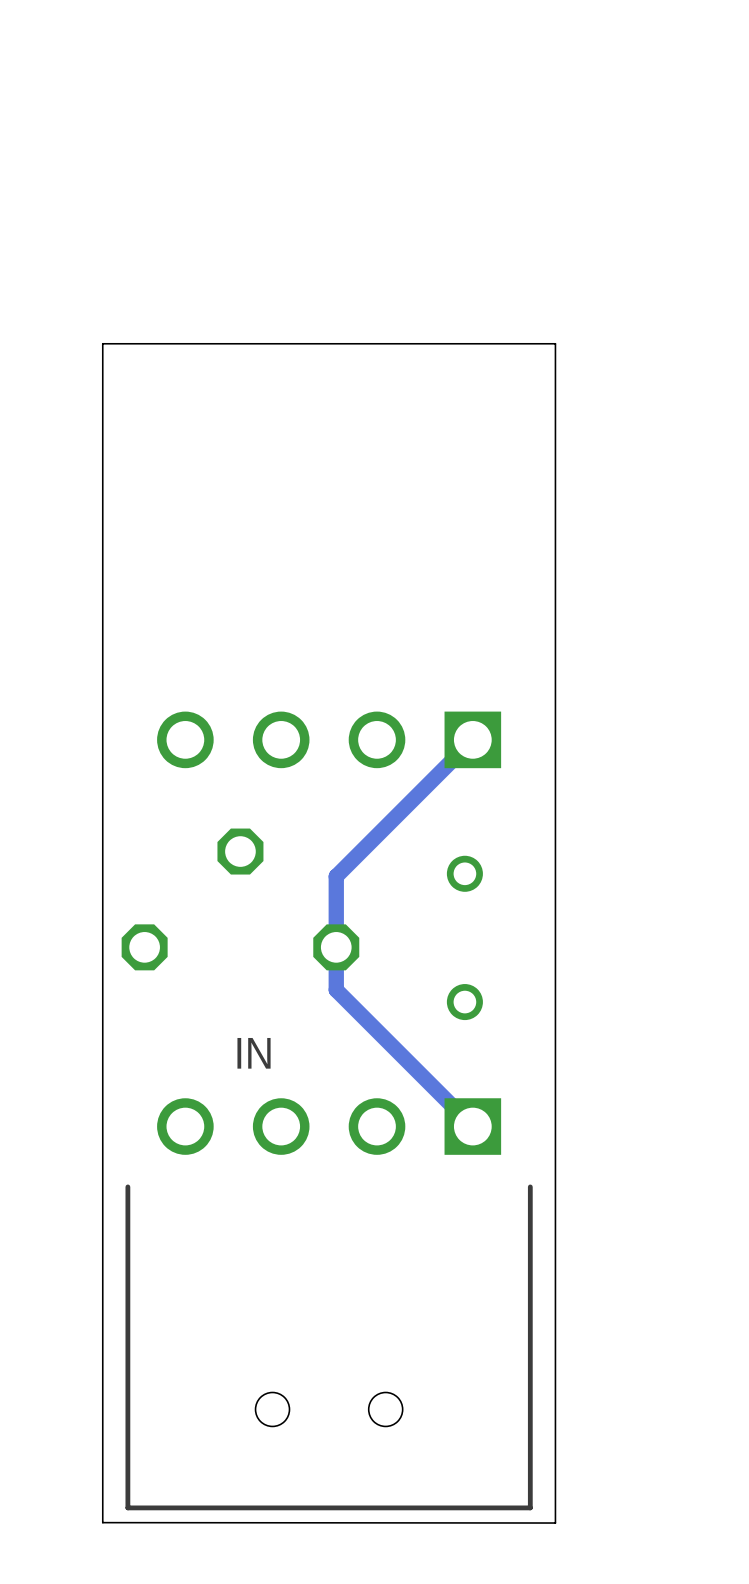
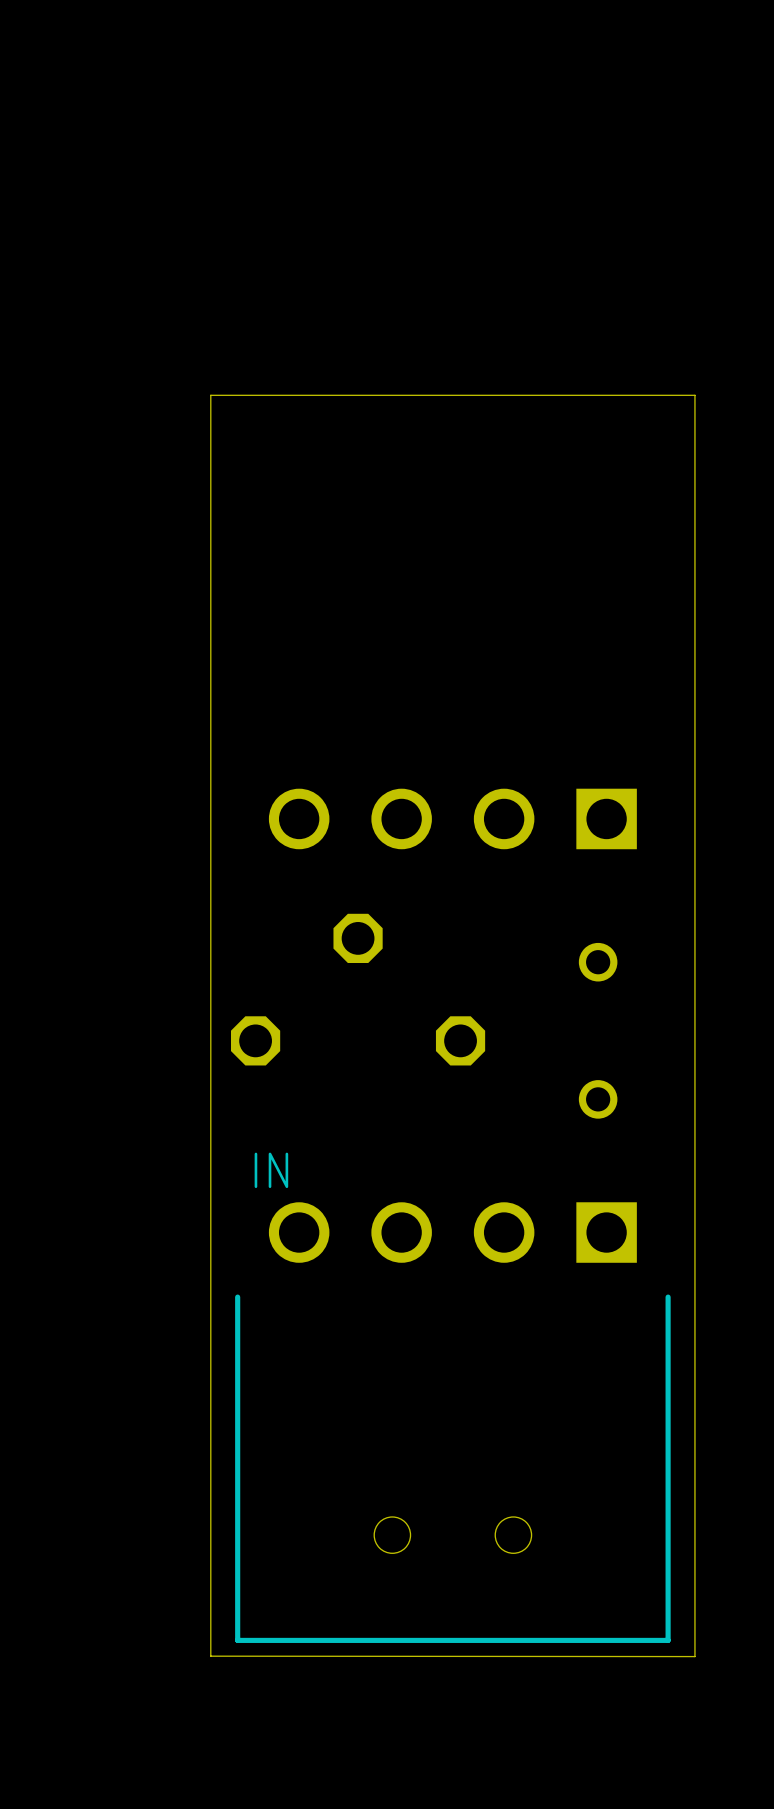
track: (472, 739) (336, 876) (336, 989) (472, 1126) -> none
IN name position: IN (254, 1053) -> IN (271, 1170)

